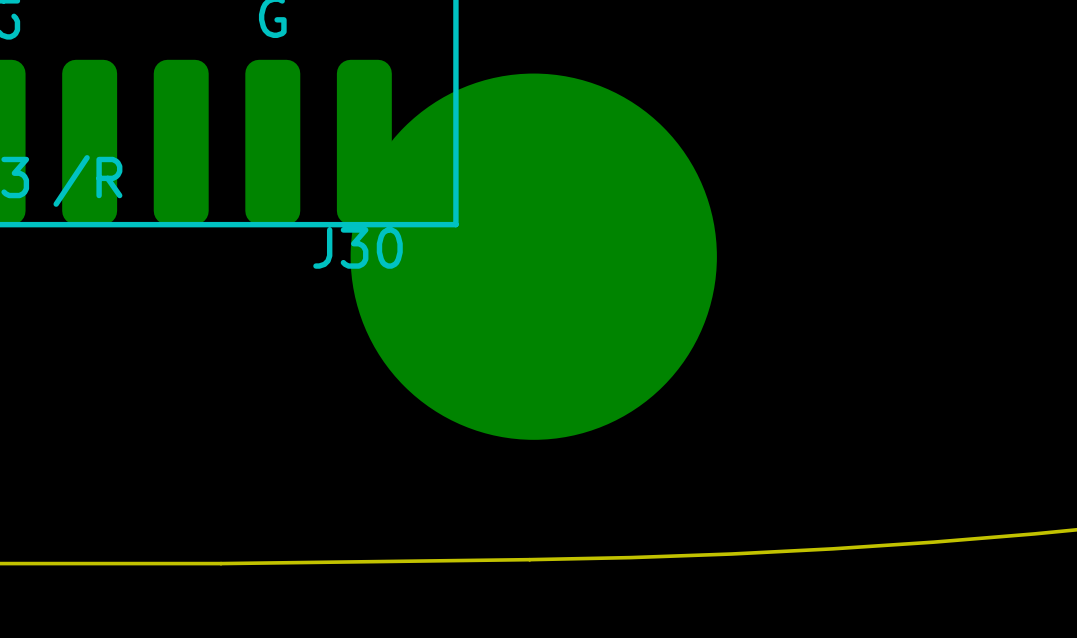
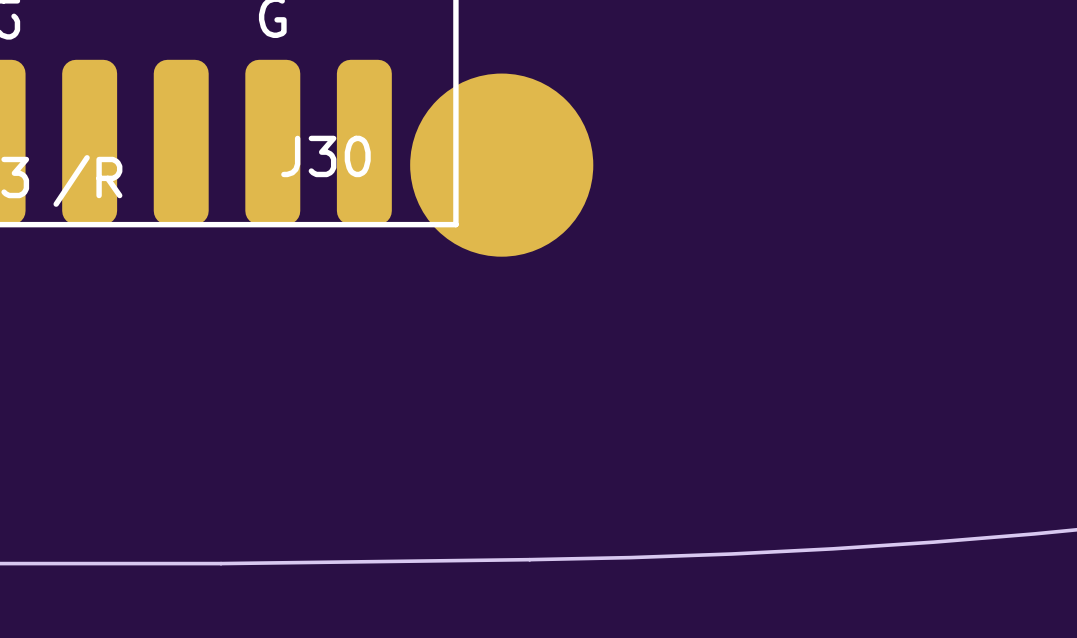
J30 footprint: [350, 73, 717, 440] -> [410, 73, 594, 257]

